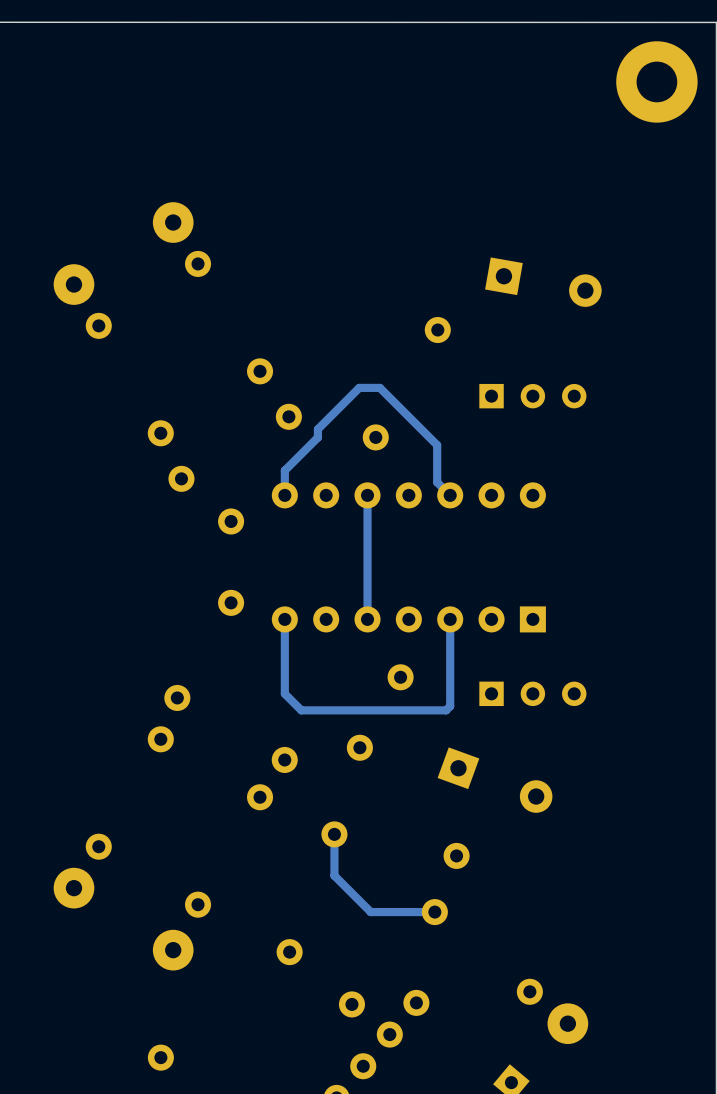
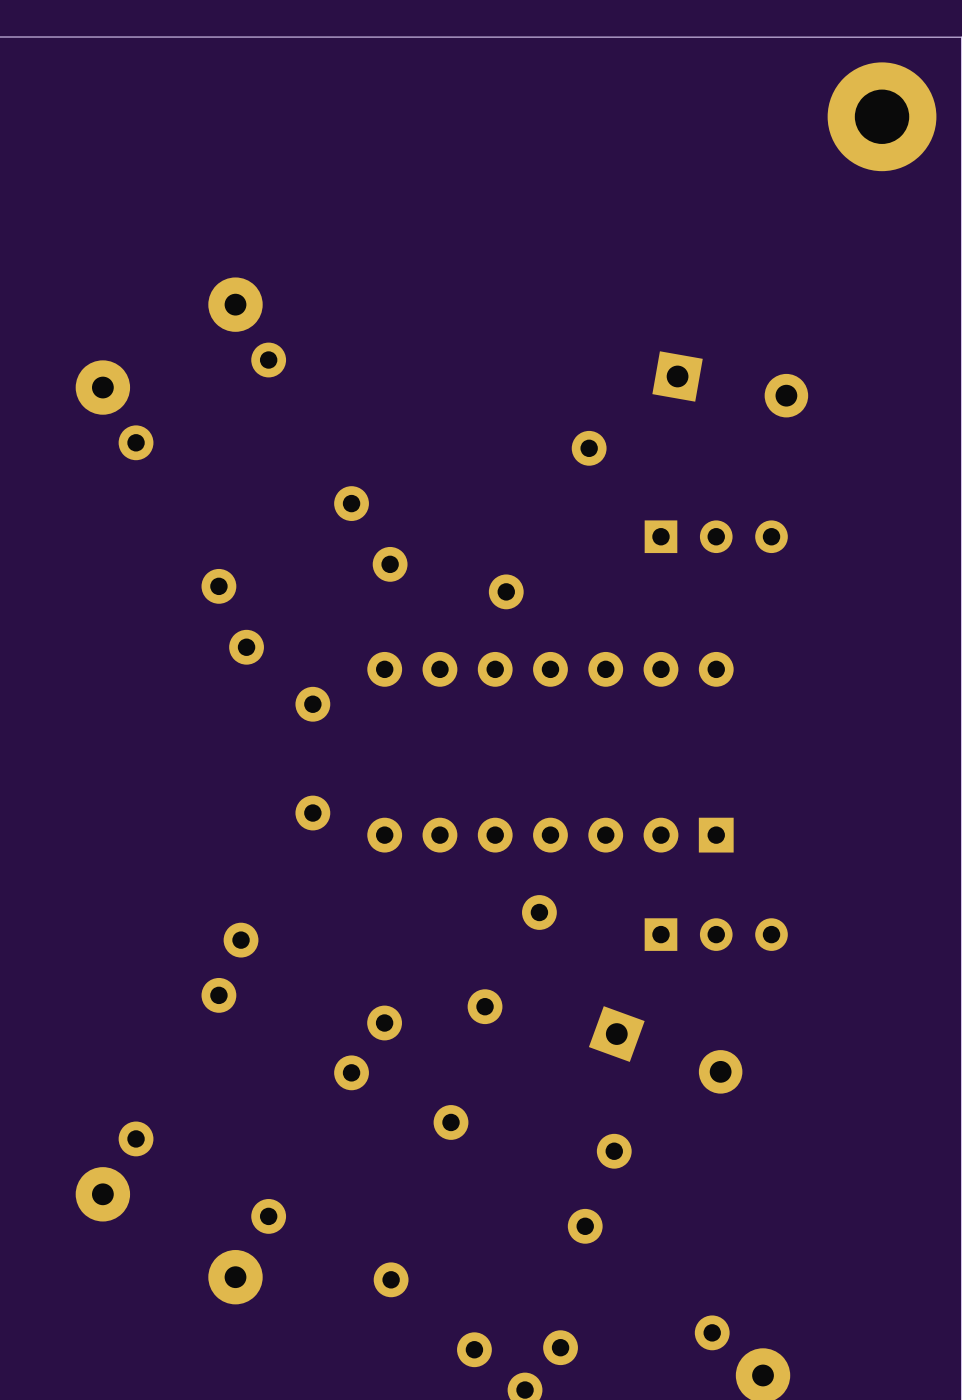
track: (367, 495) (367, 619) -> none
track: (450, 495) (437, 482) (437, 445) (379, 387) (359, 387) (317, 429) (317, 437) (284, 470) (284, 495) -> none
track: (450, 619) (450, 706) (446, 710) (301, 710) (284, 693) (284, 619) -> none
track: (334, 834) (334, 875) (370, 912) (434, 912) -> none

